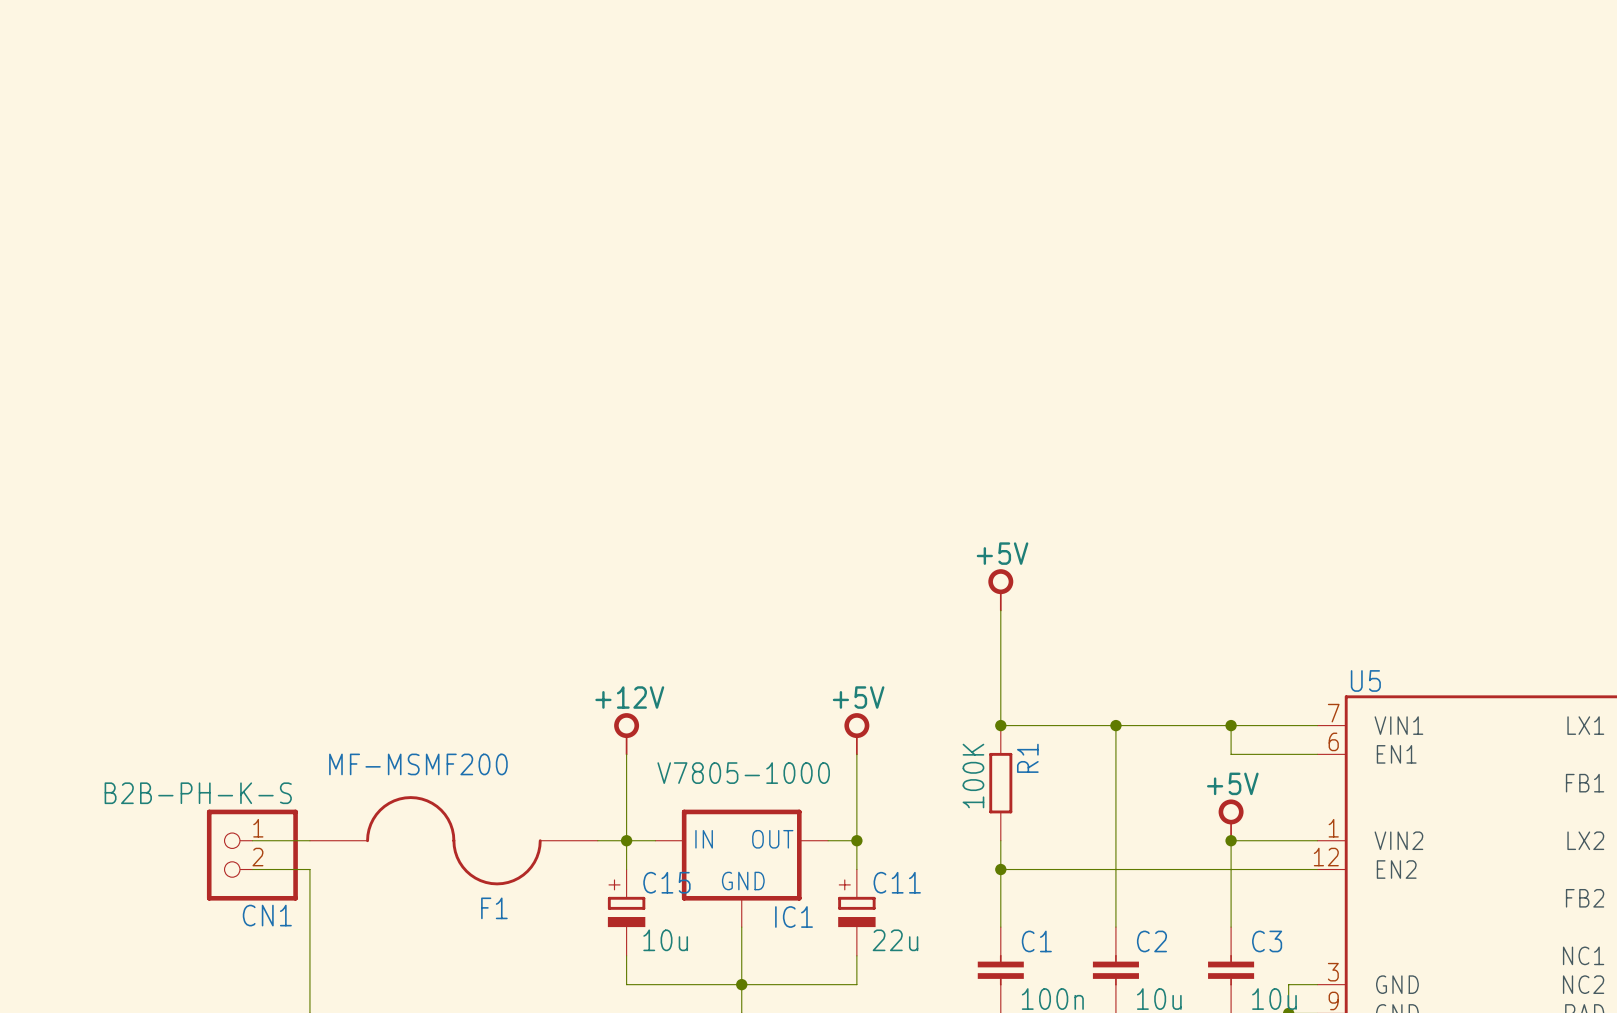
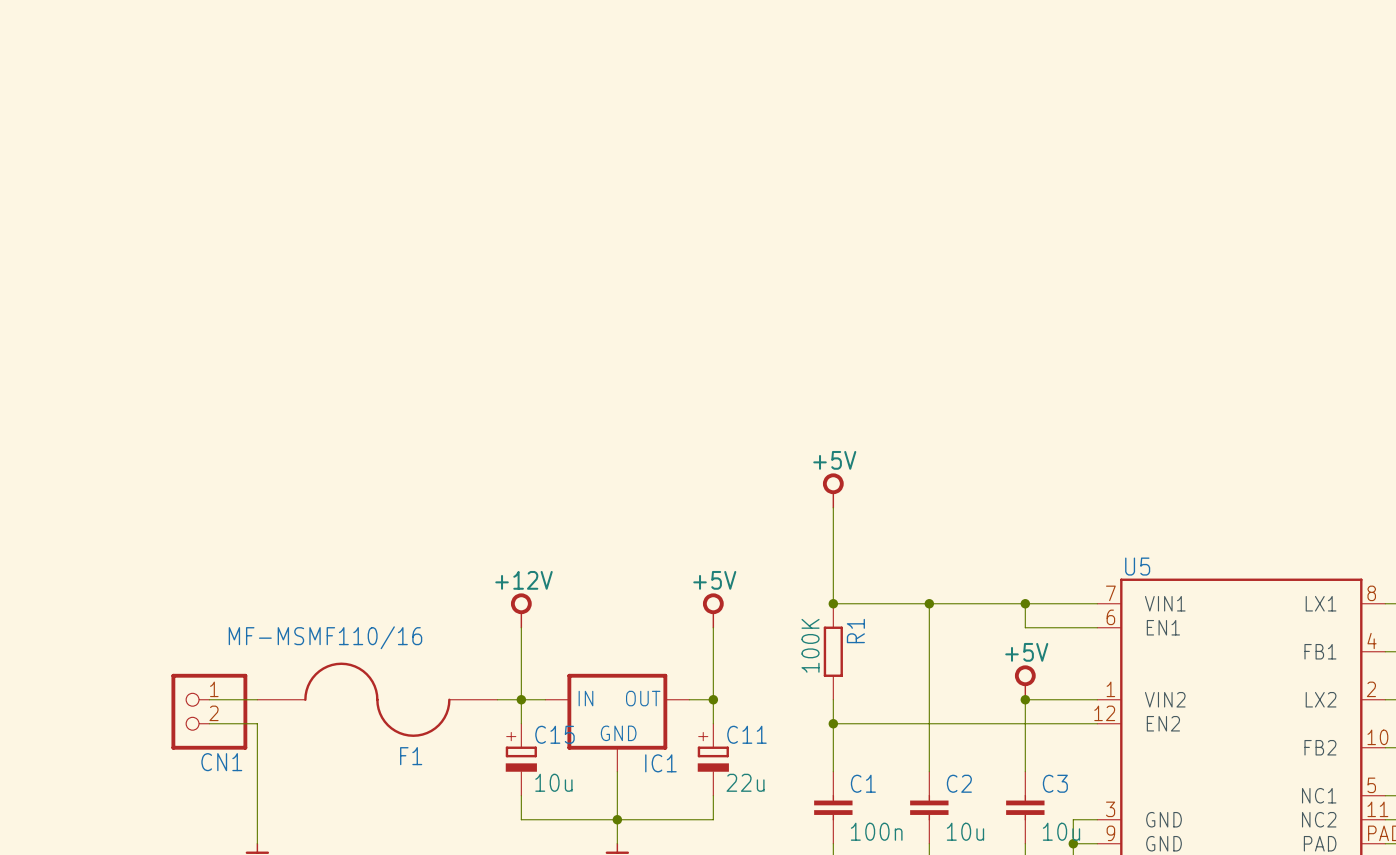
F1 value: MF-MSMF200 (418, 764) -> MF-MSMF110/16 (325, 637)
IC1 value: V7805-1000 (743, 773) -> none
CN1 value: B2B-PH-K-S (198, 793) -> none

